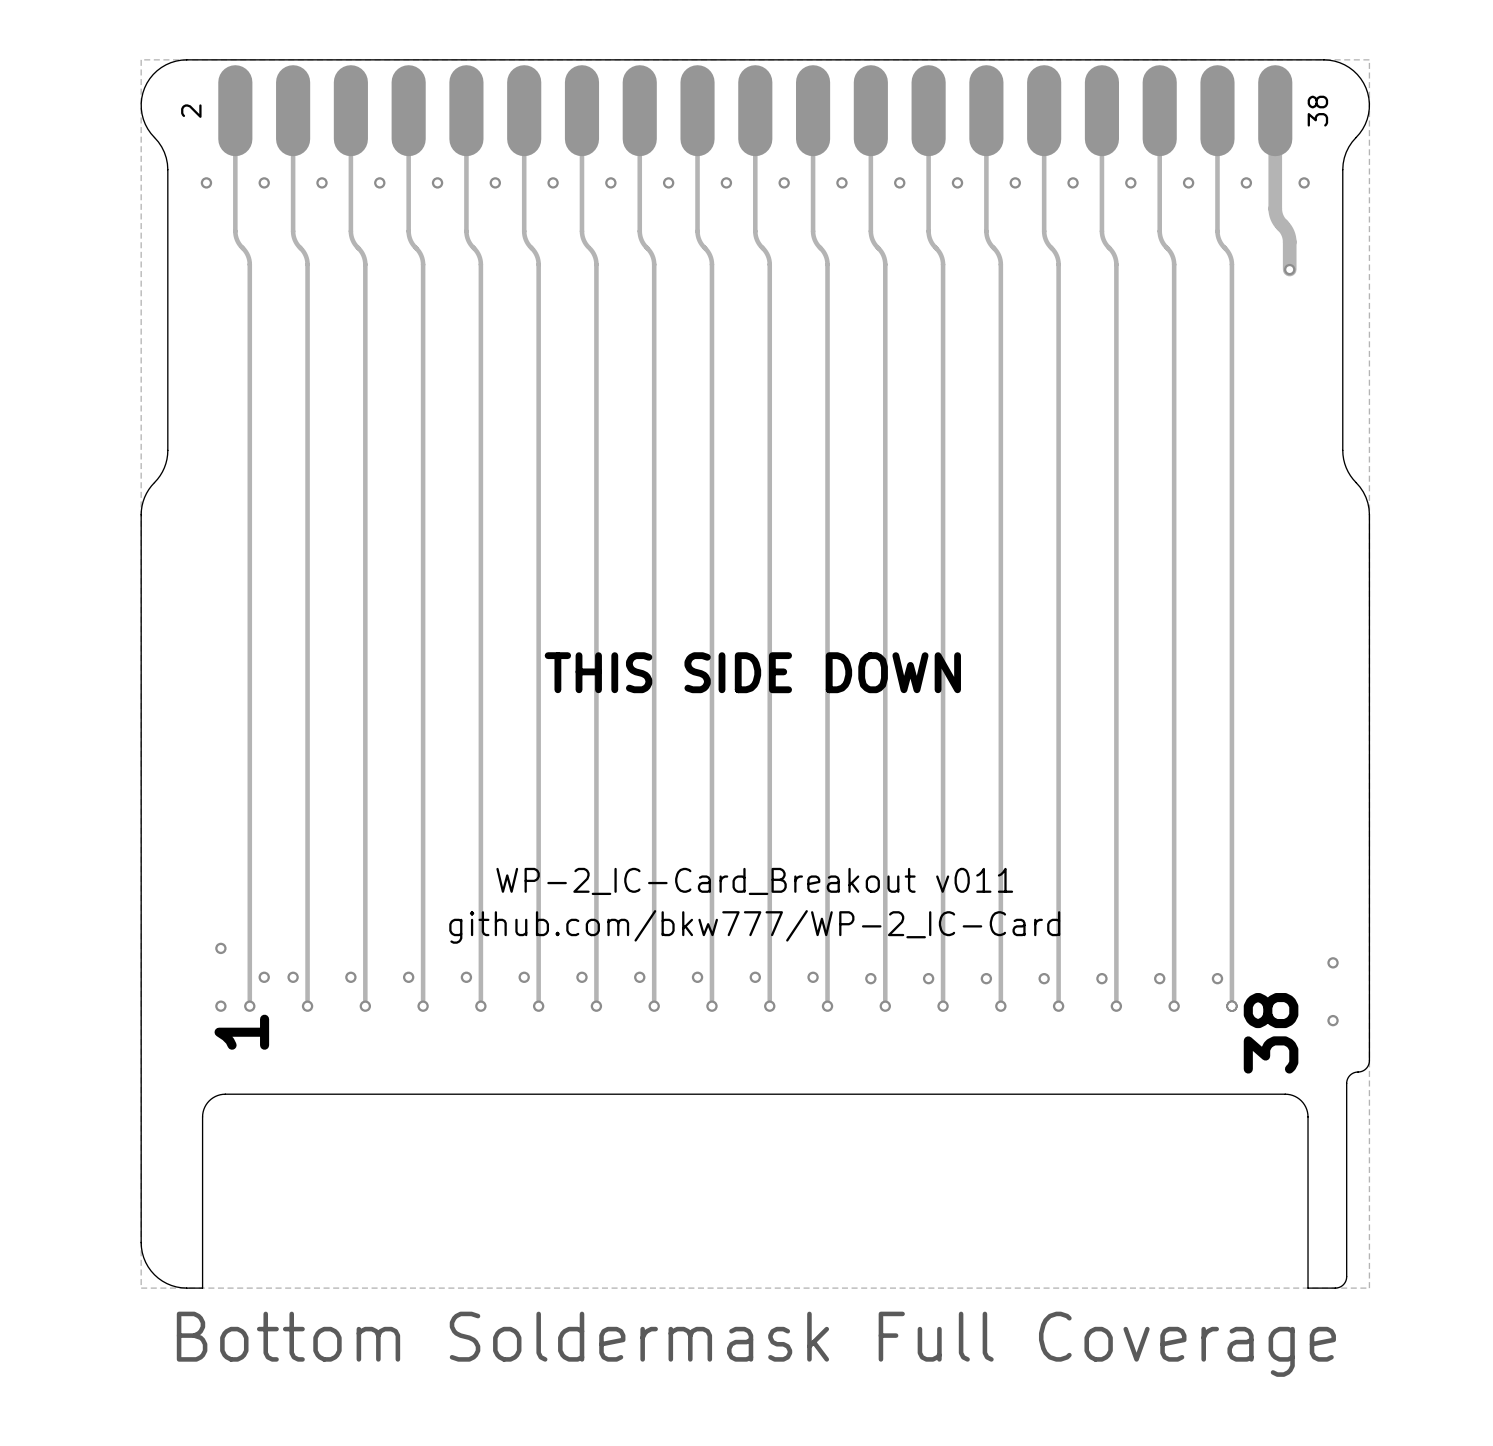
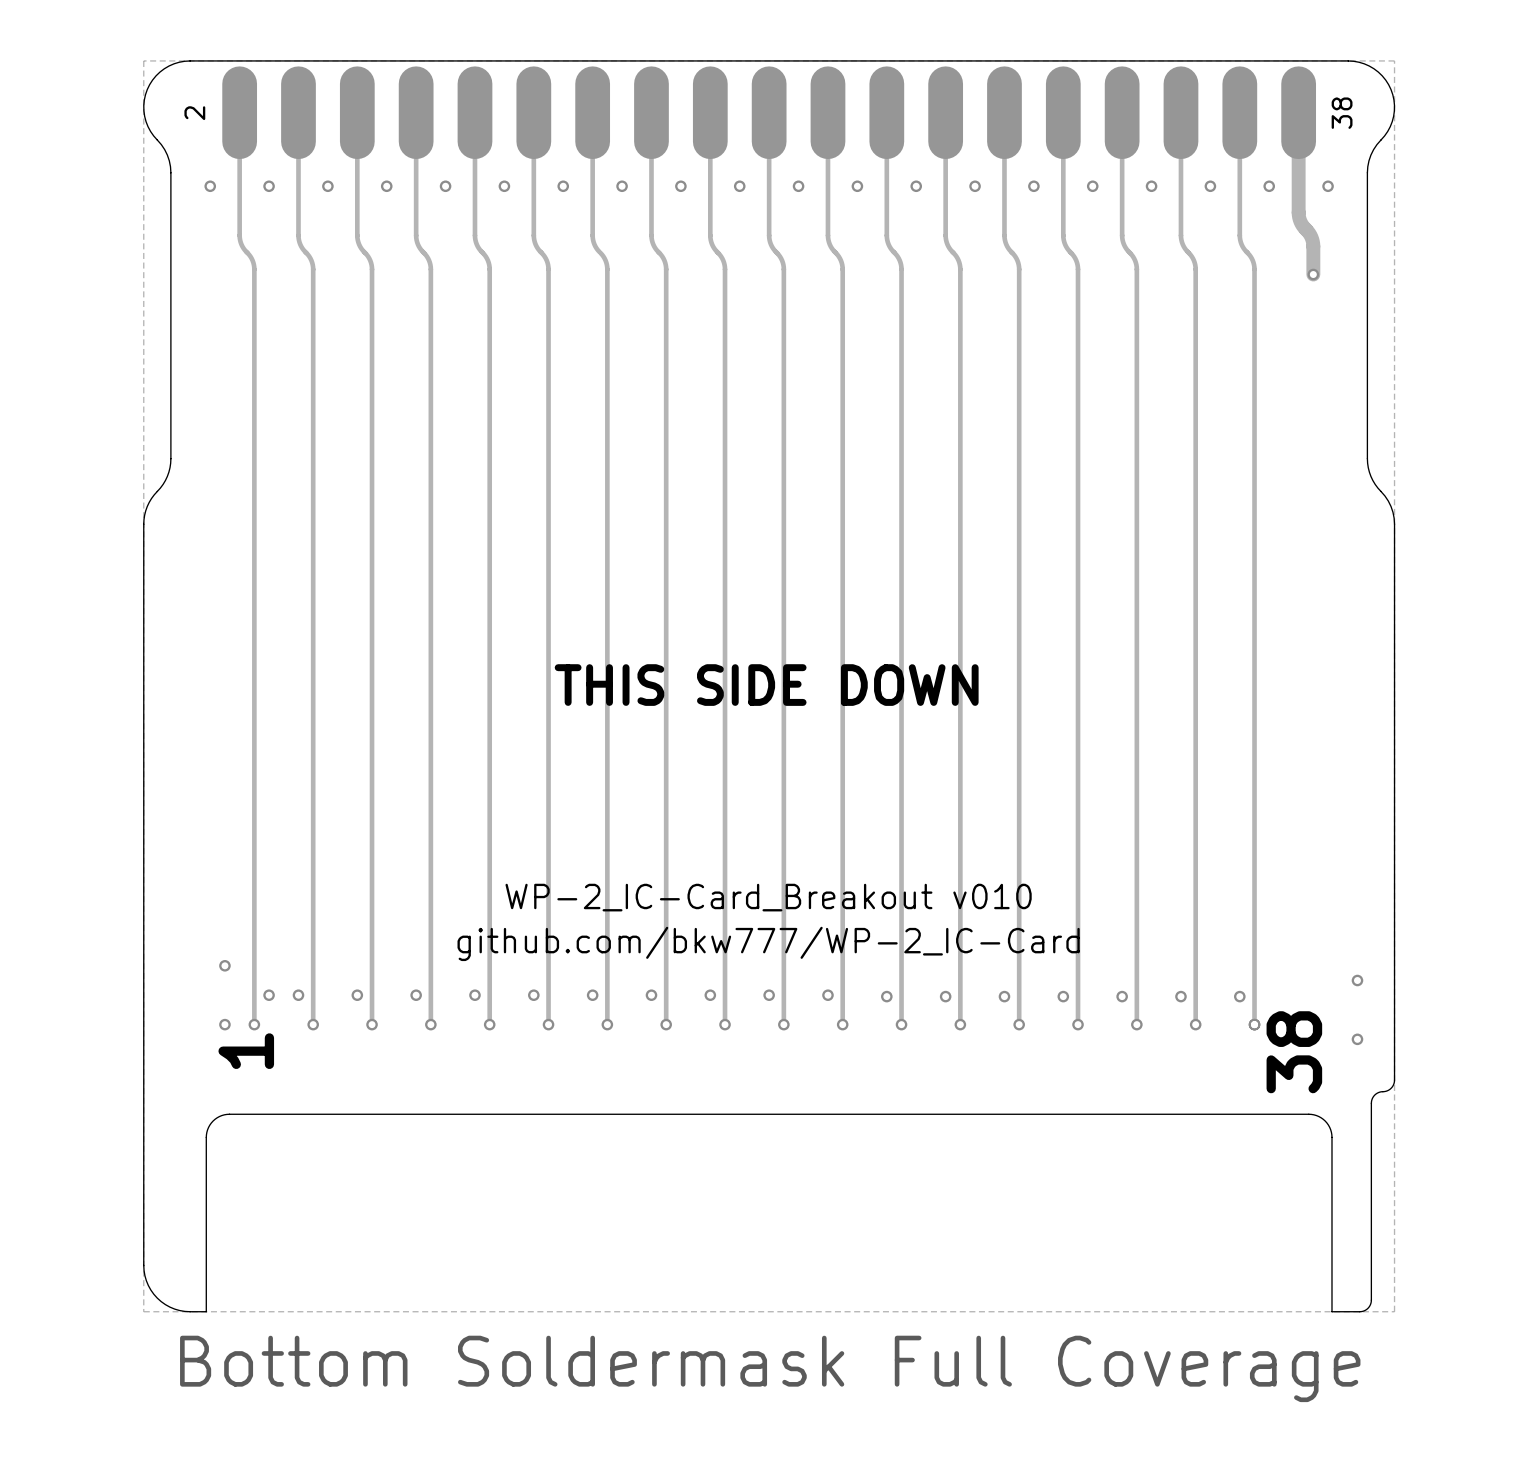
text: WP-2_IC-Card_Breakout v011 (754, 881) -> WP-2_IC-Card_Breakout v010 (768, 897)

